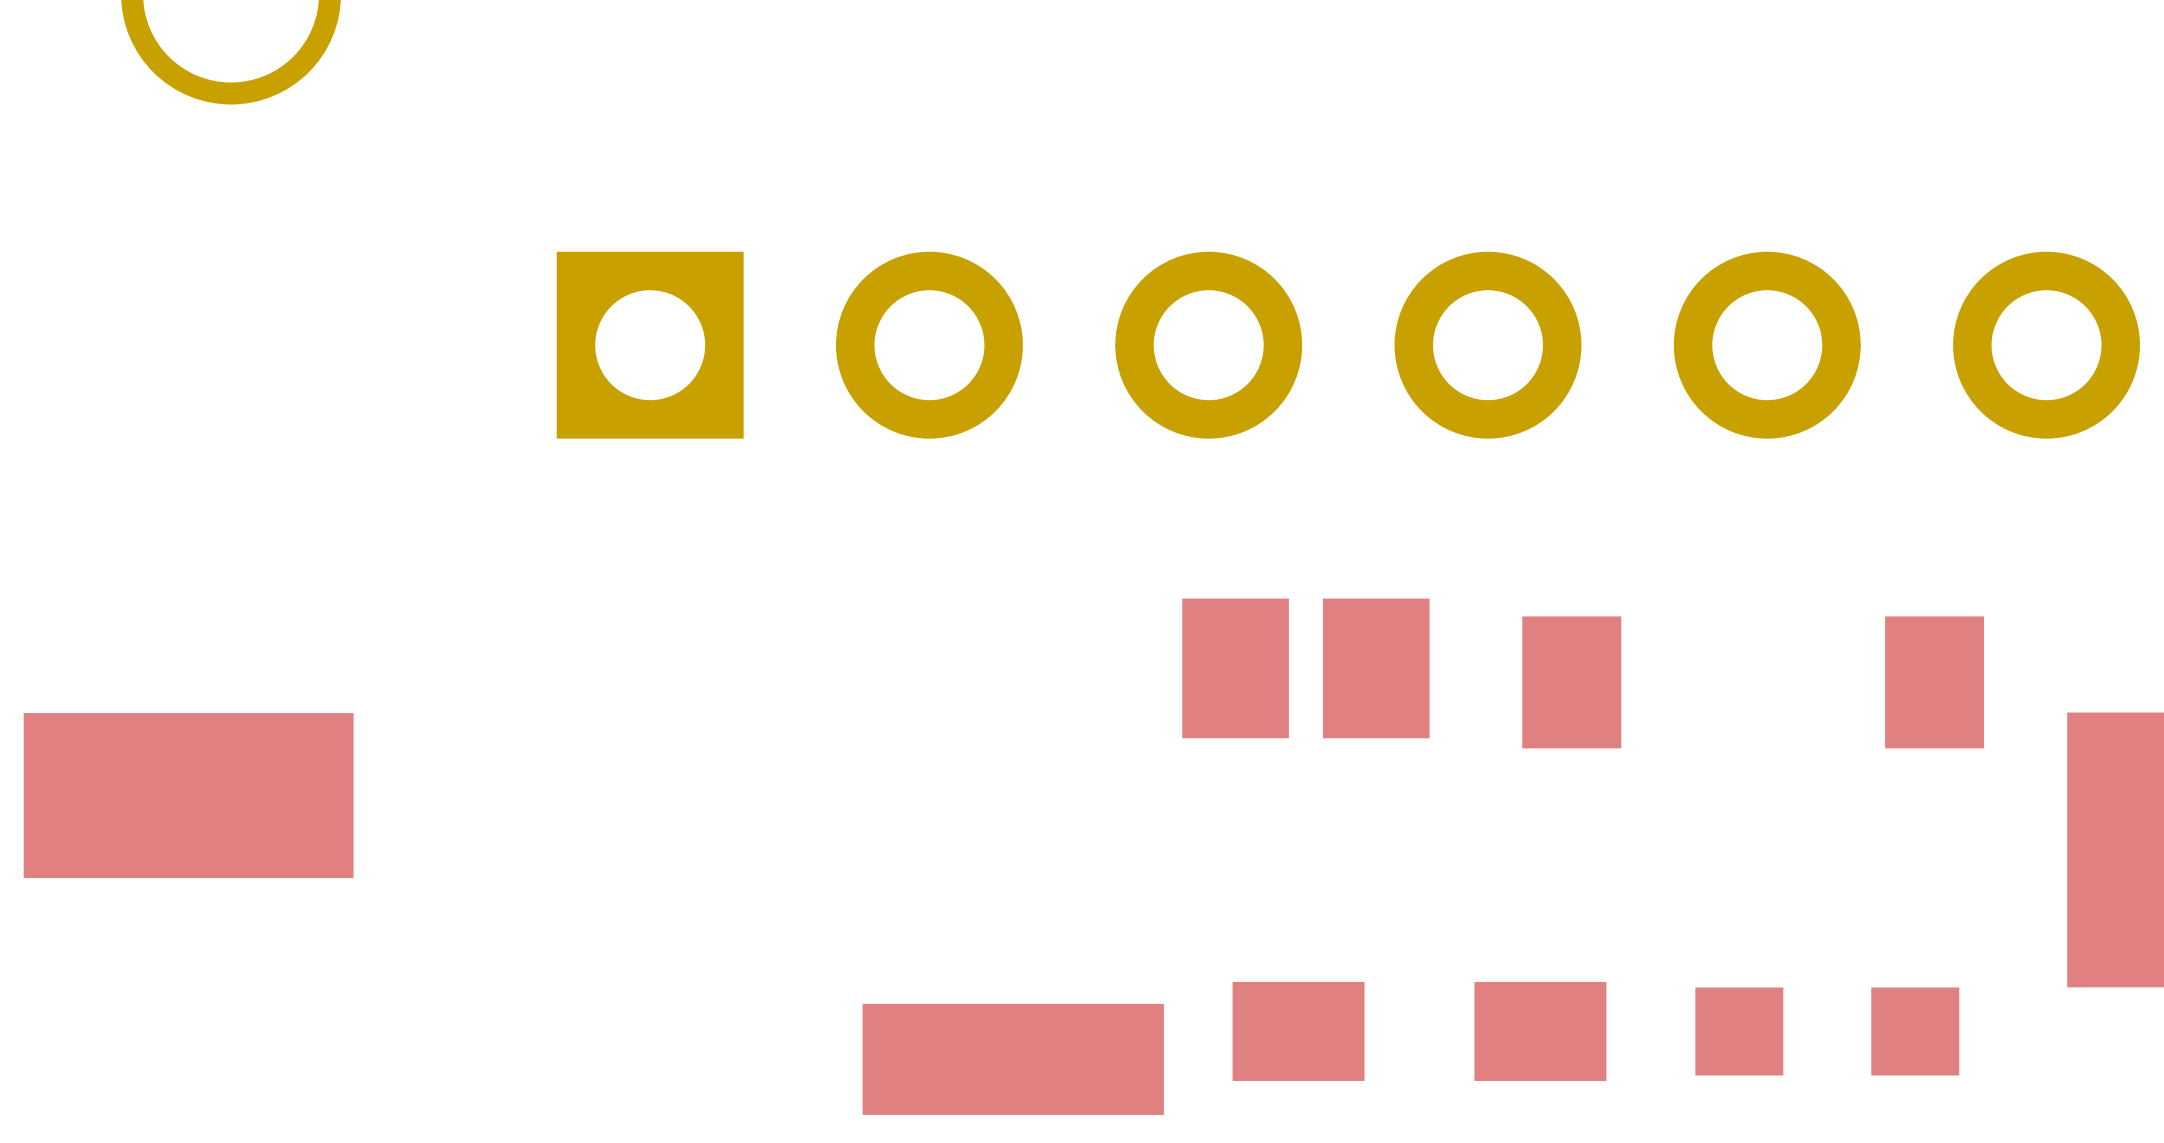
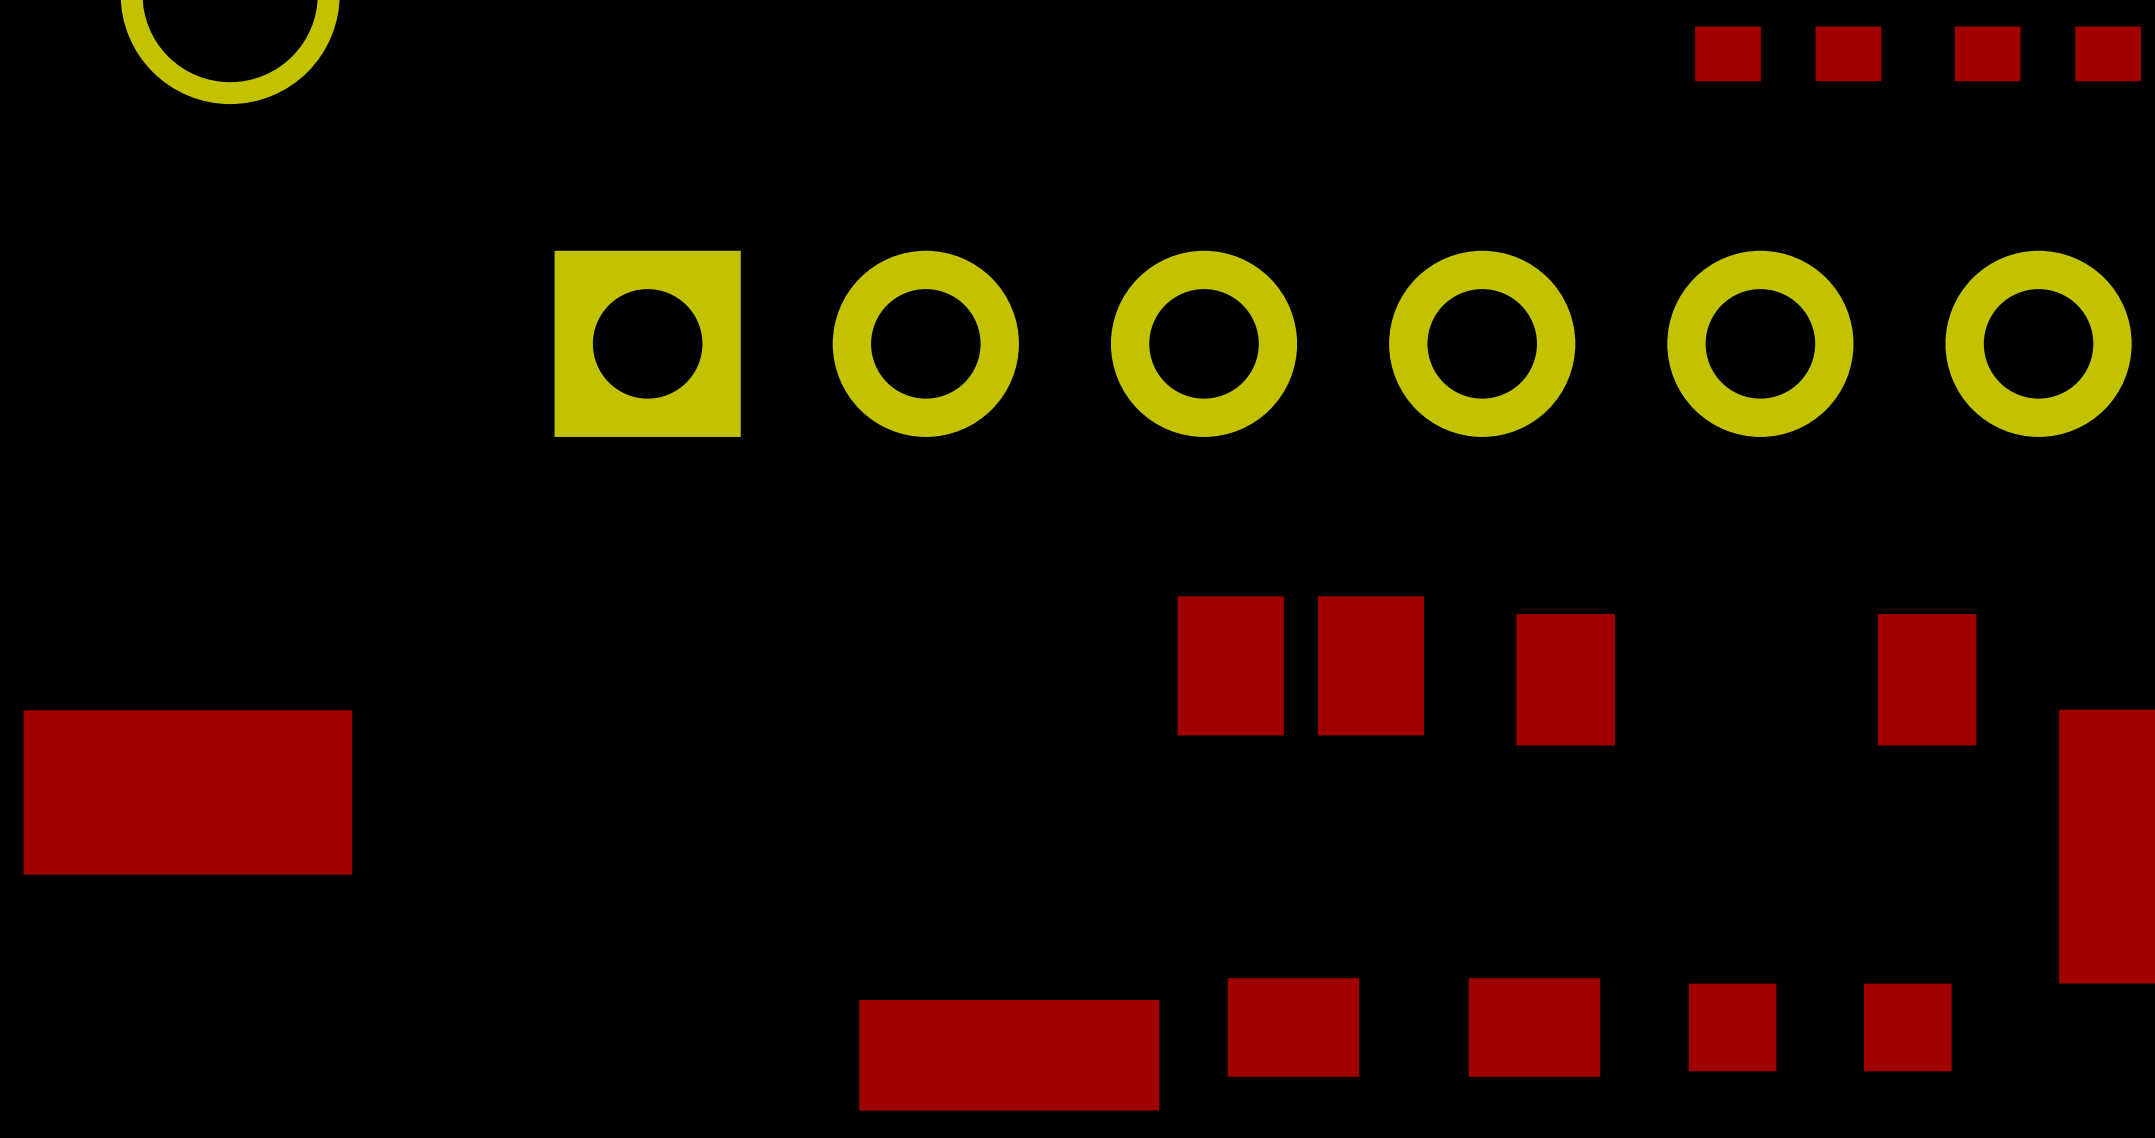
part: none -> (1788, 53)
part: none -> (2047, 53)

